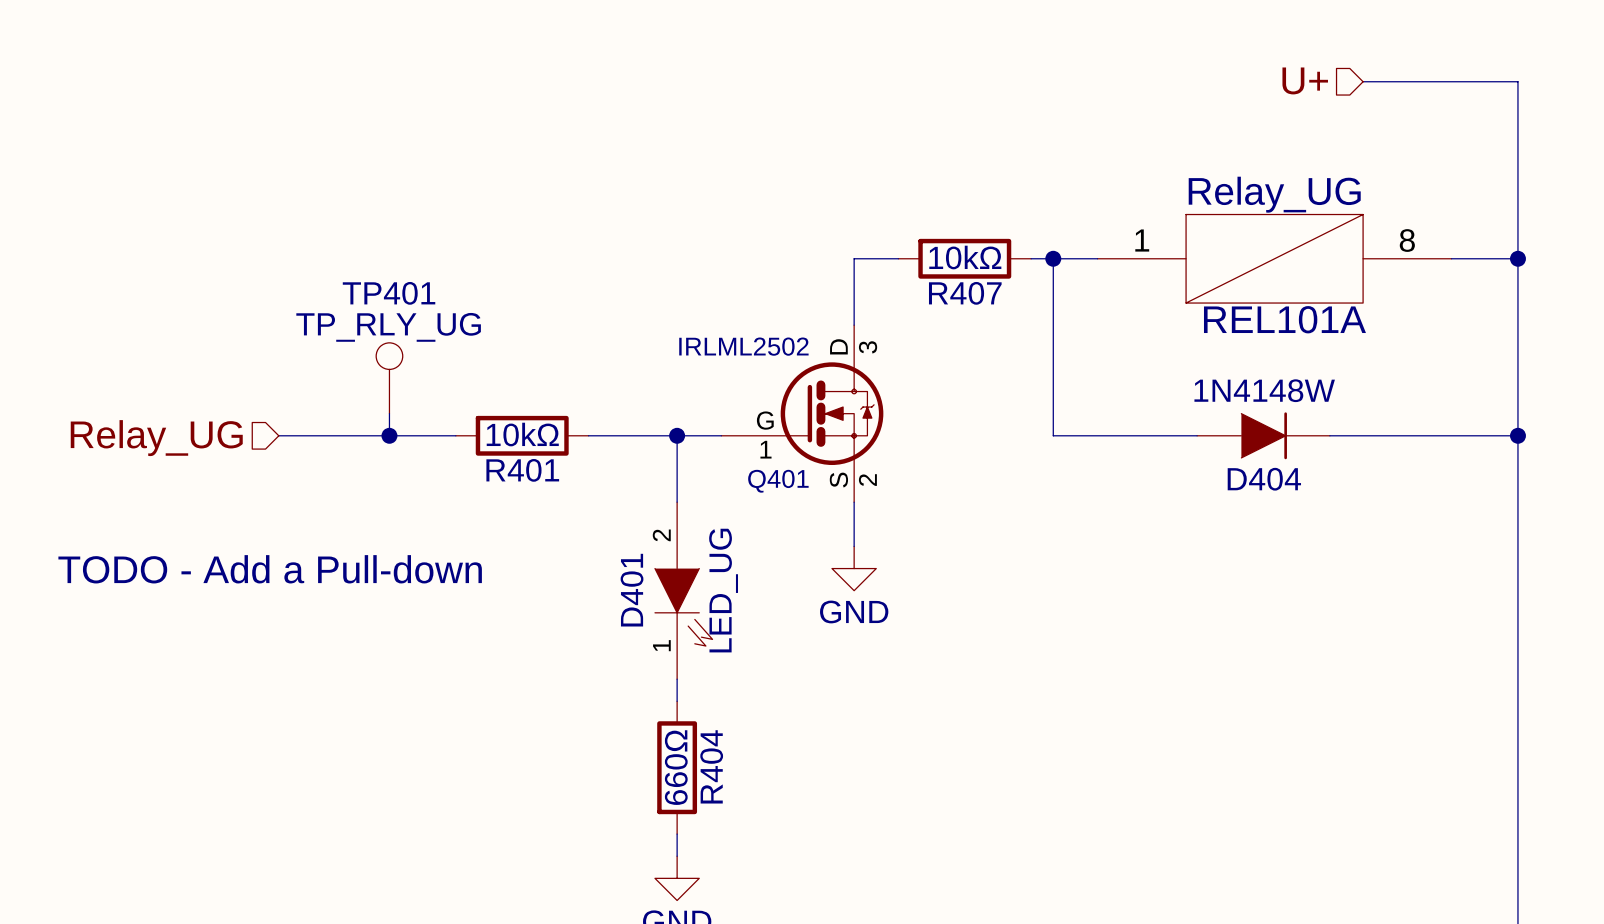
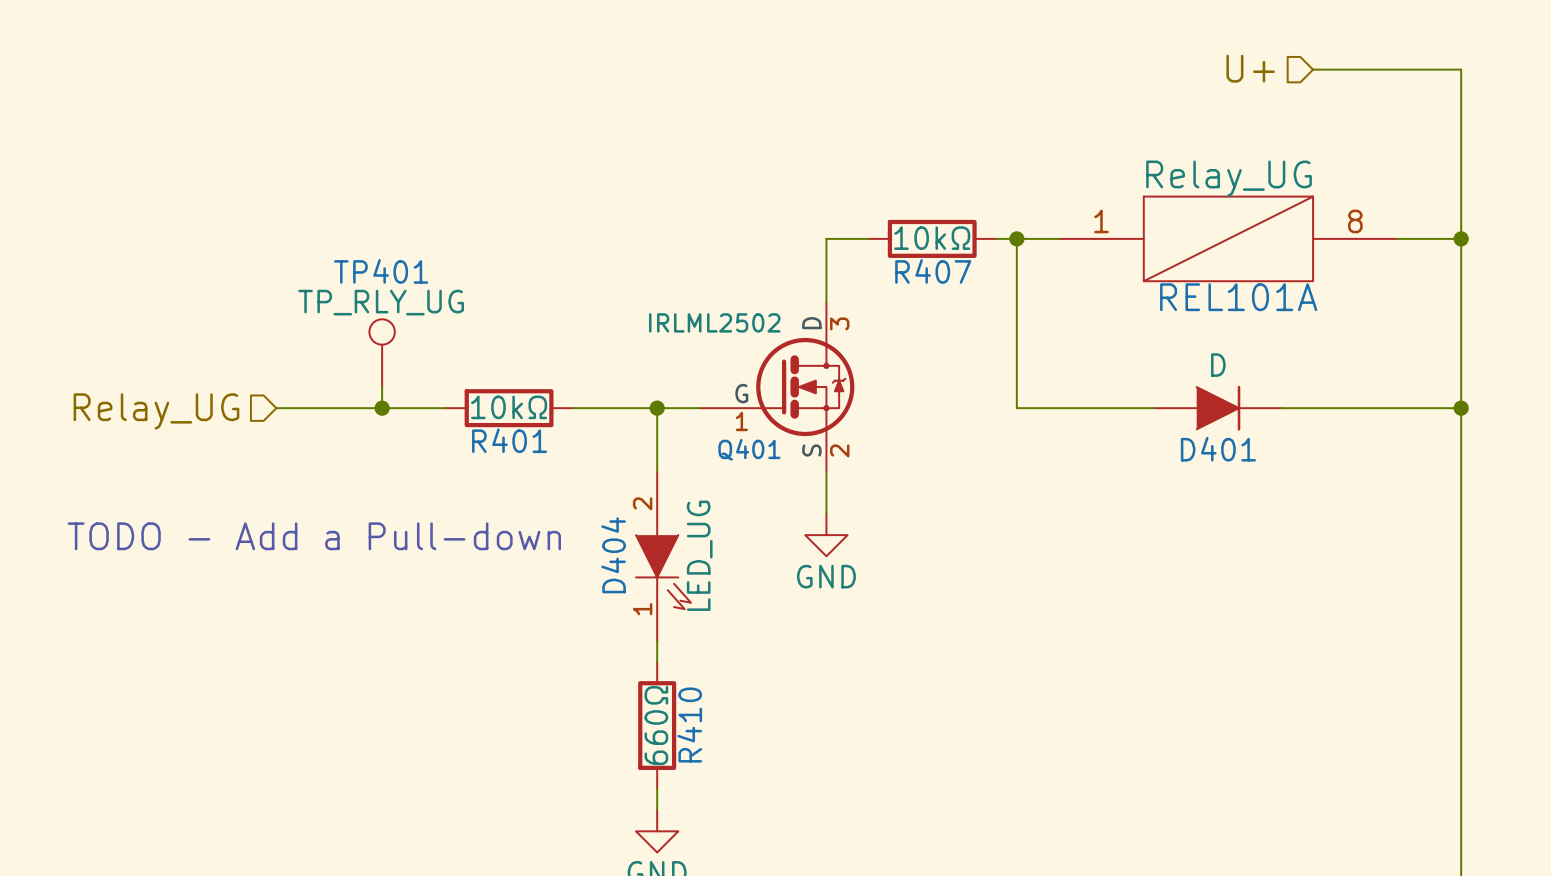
D404 value: 1N4148W (1264, 390) -> D (1218, 365)
D404 name: D404 (1264, 479) -> D401 (1218, 449)
D401 name: D401 (632, 590) -> D404 (613, 555)
R404 name: R404 (711, 766) -> R410 (689, 725)

